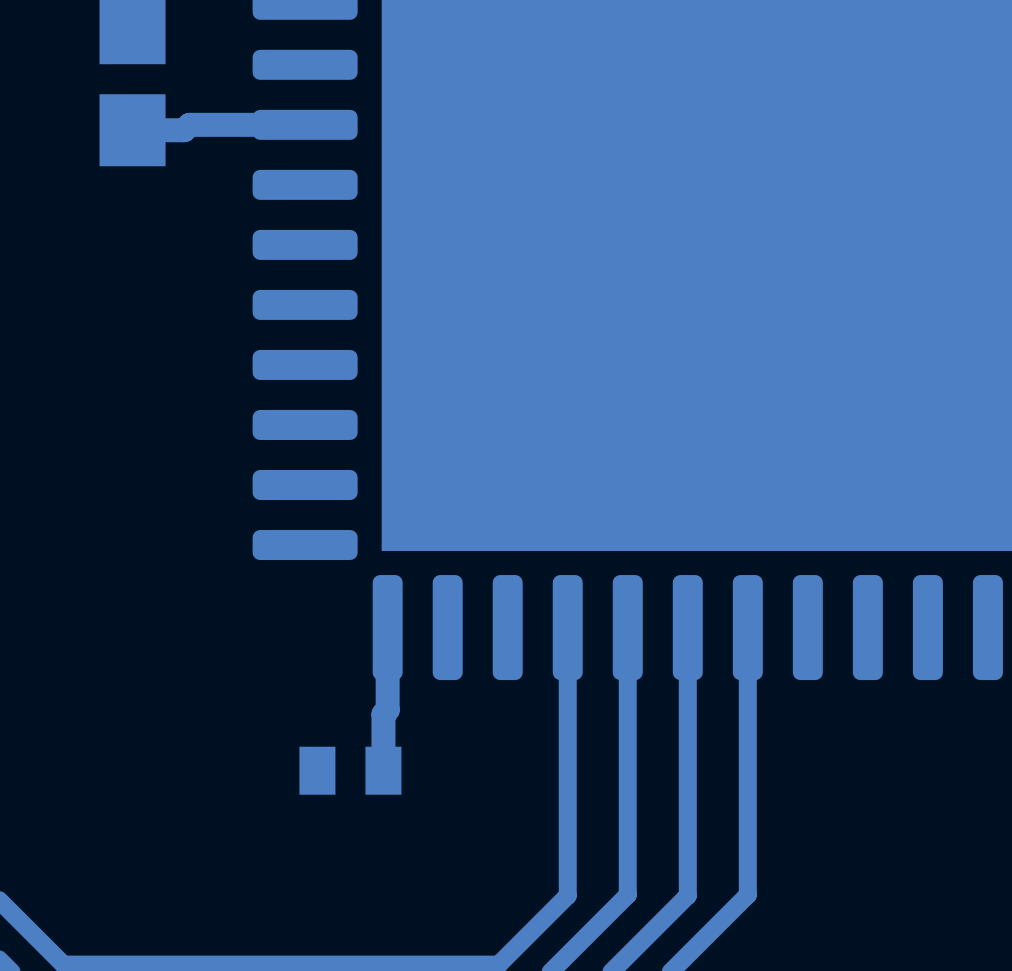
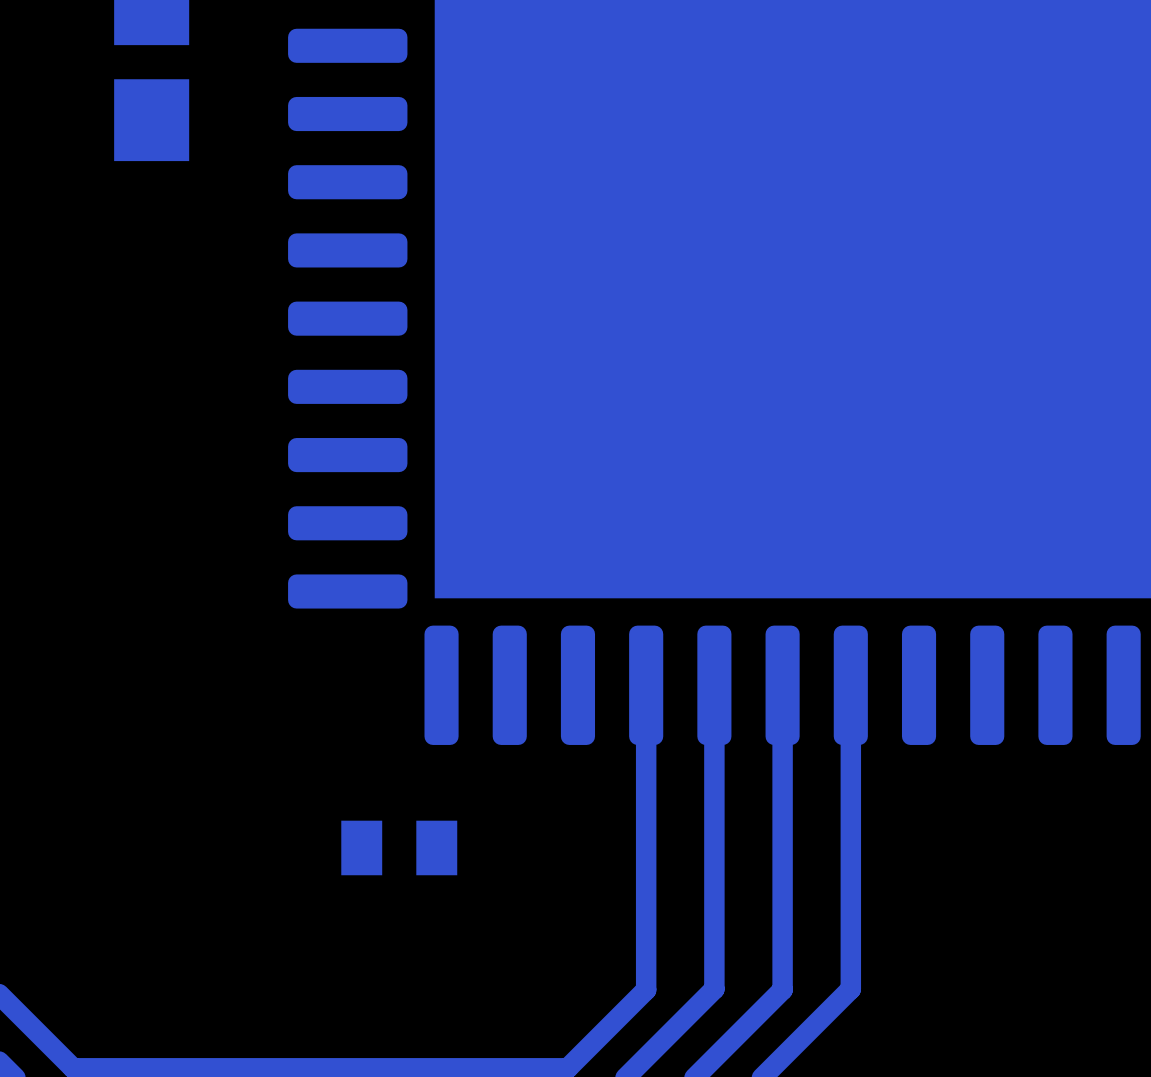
bottom track: (305, 124) (189, 124) (184, 130) (132, 130) -> none
bottom track: (387, 627) (387, 710) (383, 714) (383, 770) -> none

